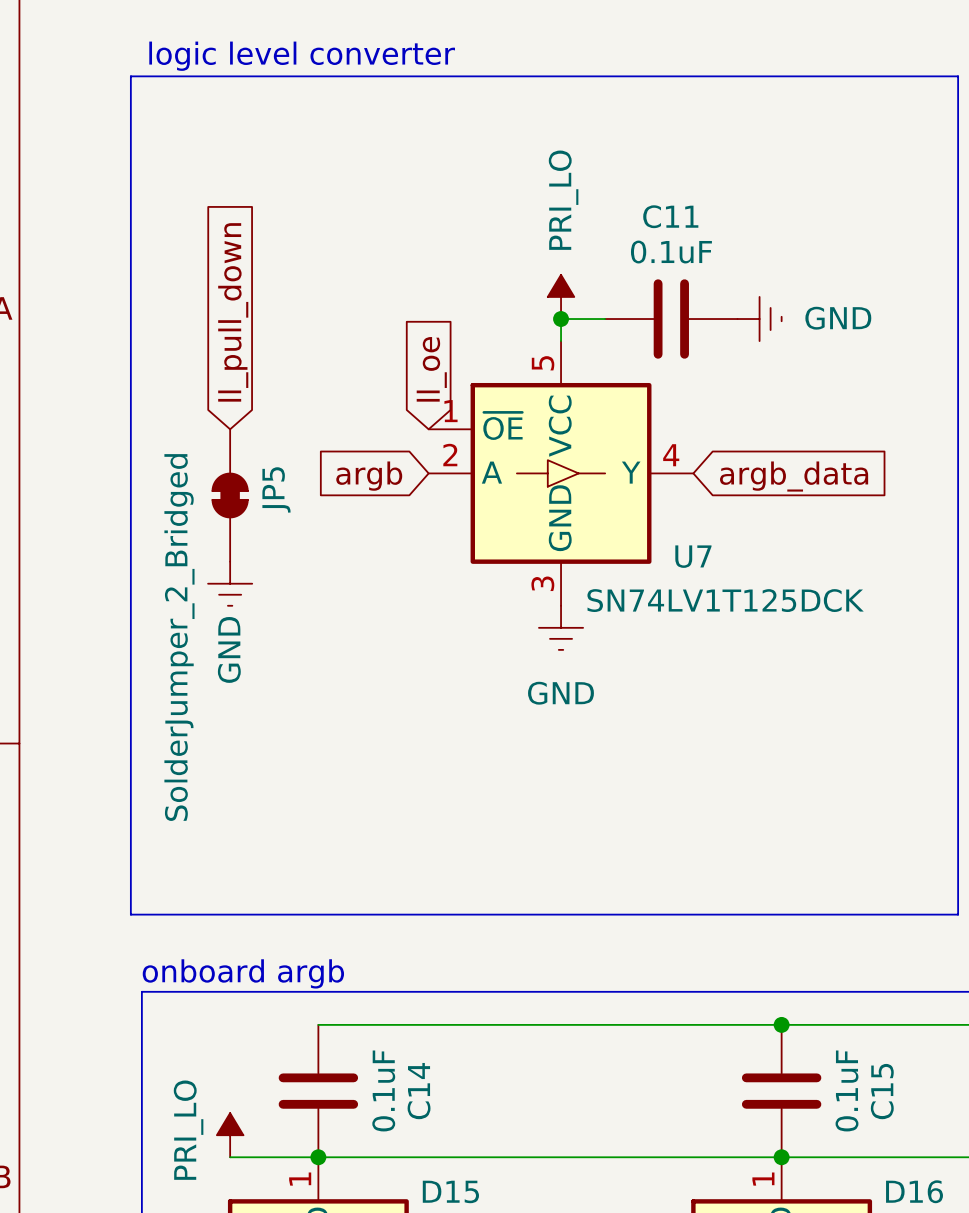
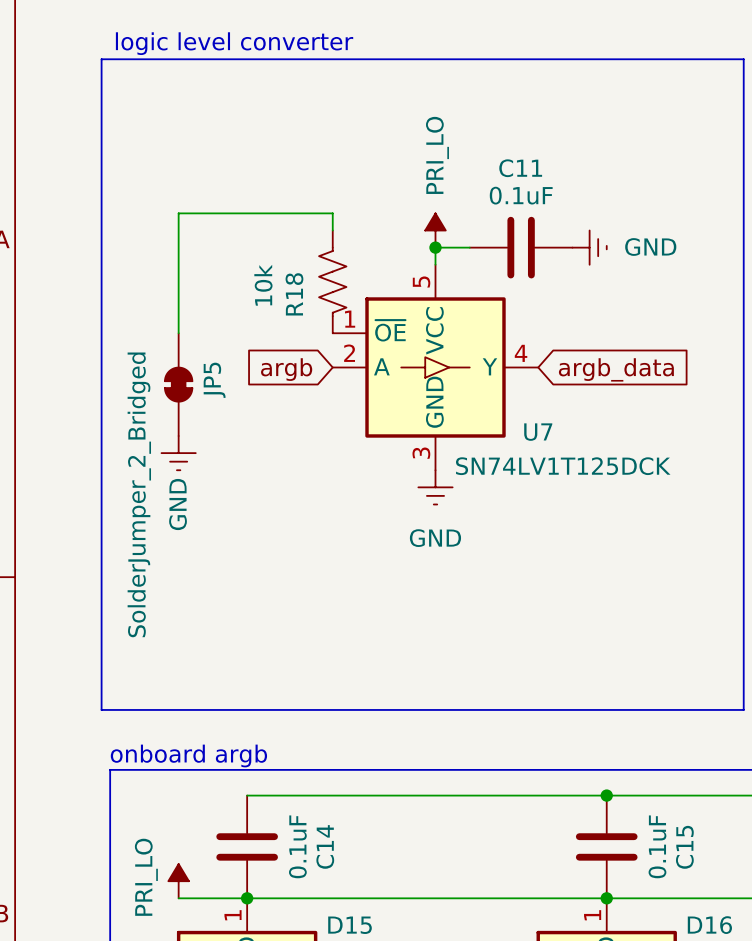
wire: none -> (332, 230) (332, 213) (178, 213) (178, 333)
global label: ll_pull_down (233, 312) -> none
R18: none -> 10k (332, 281)
global label: ll_oe (431, 369) -> none

